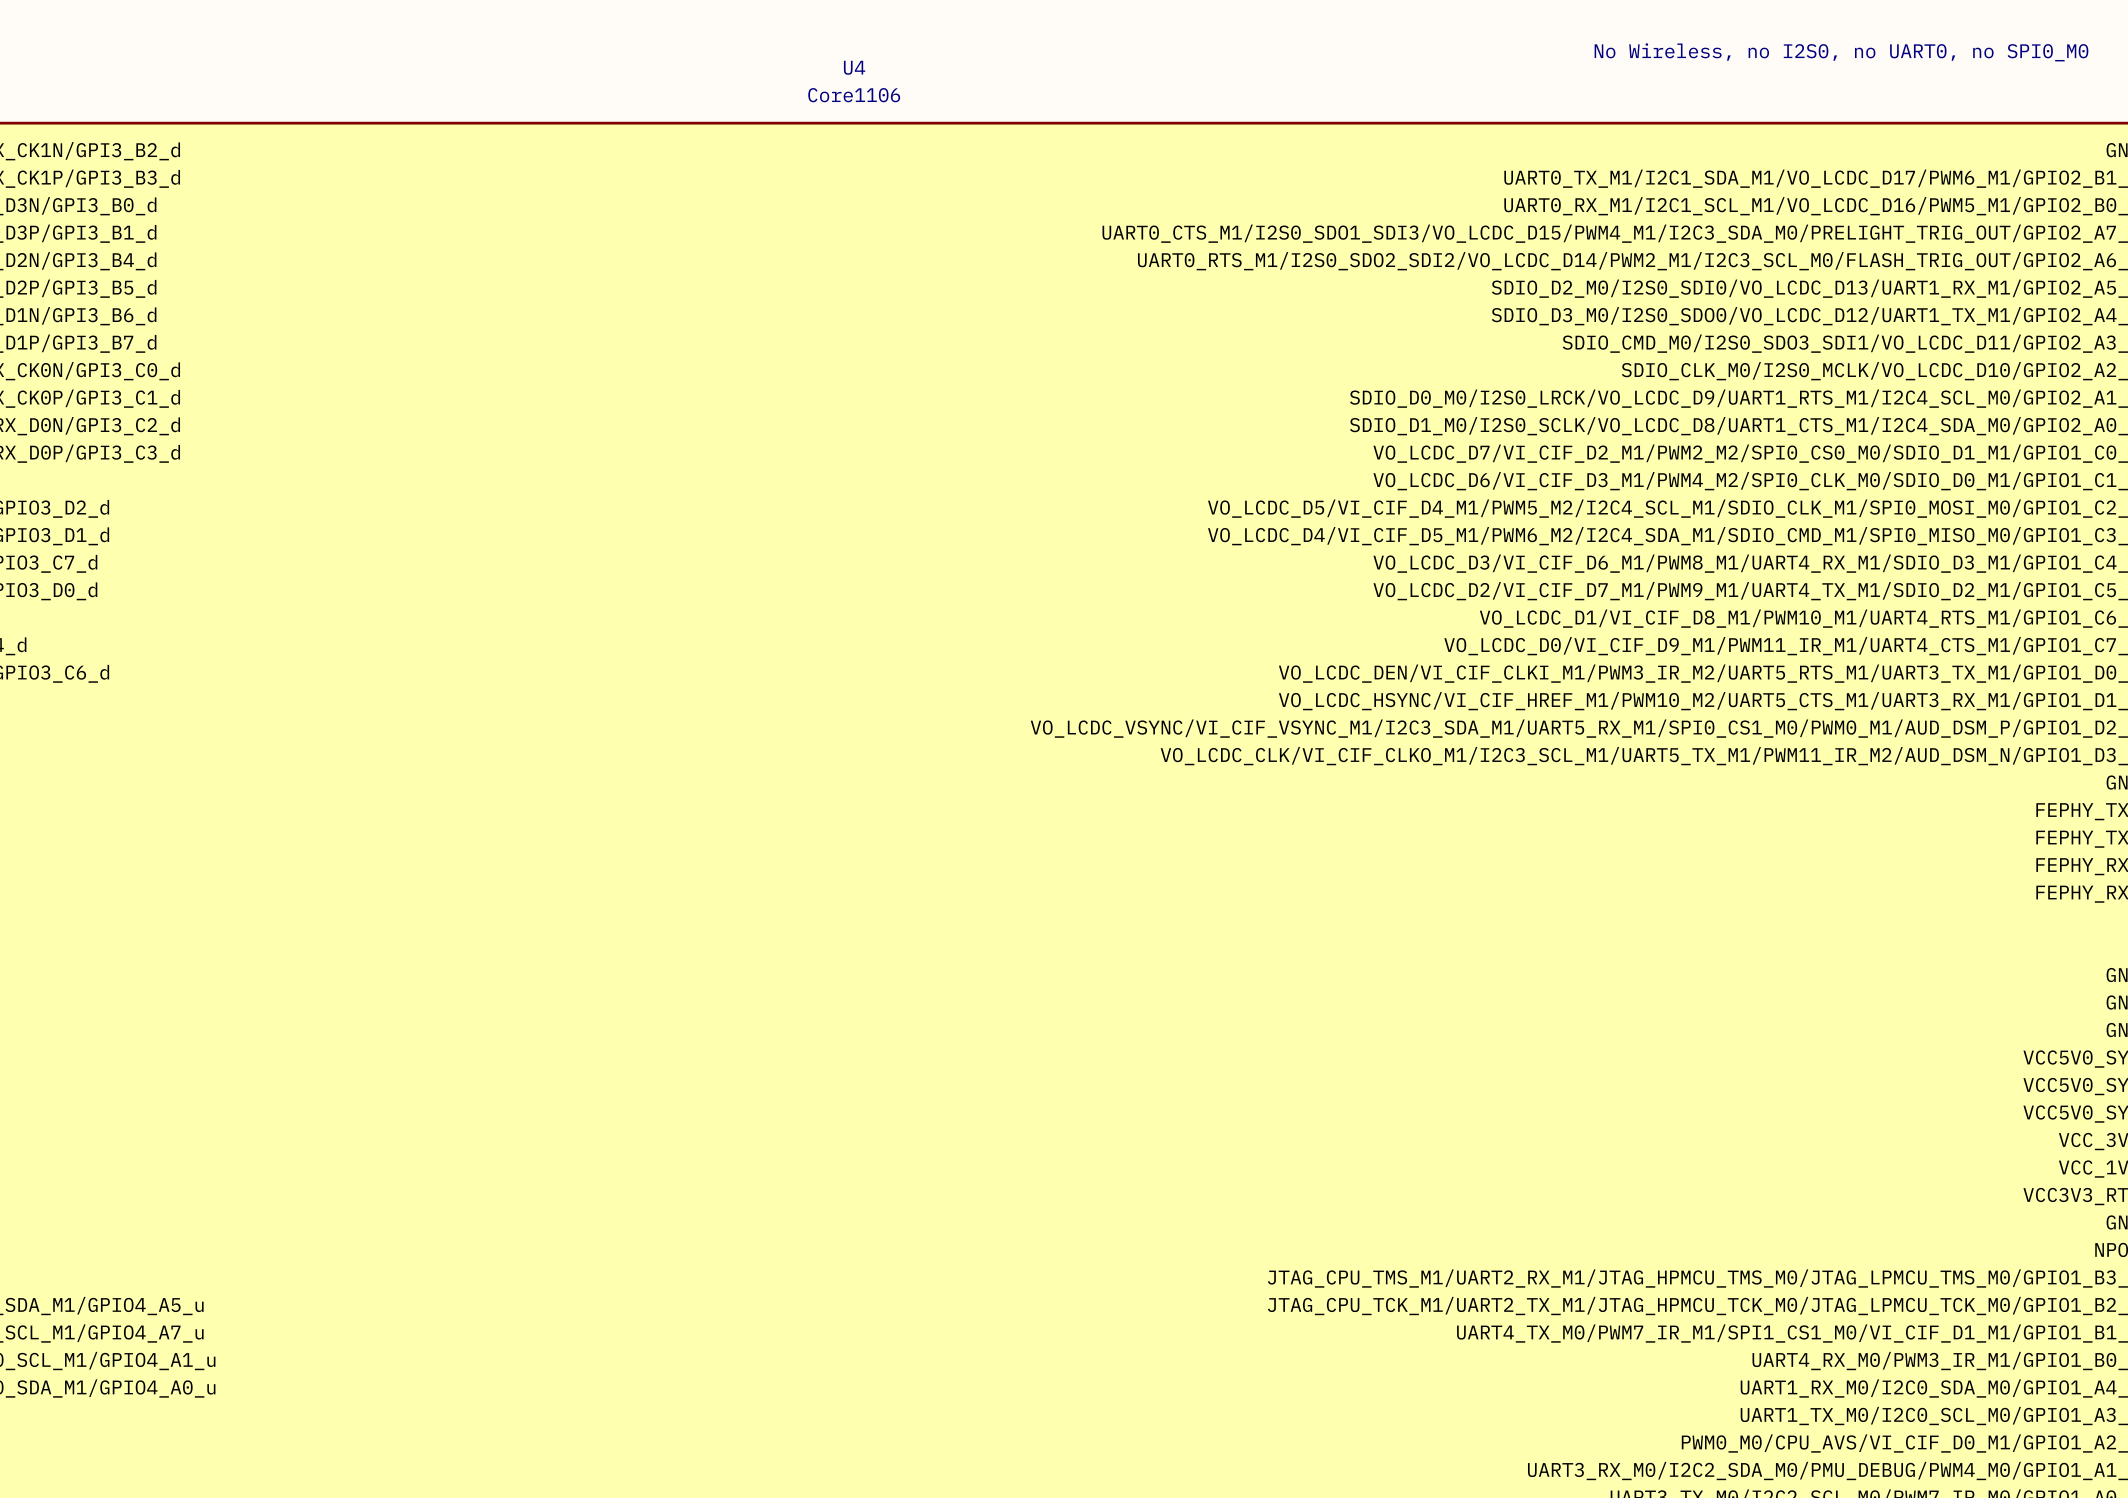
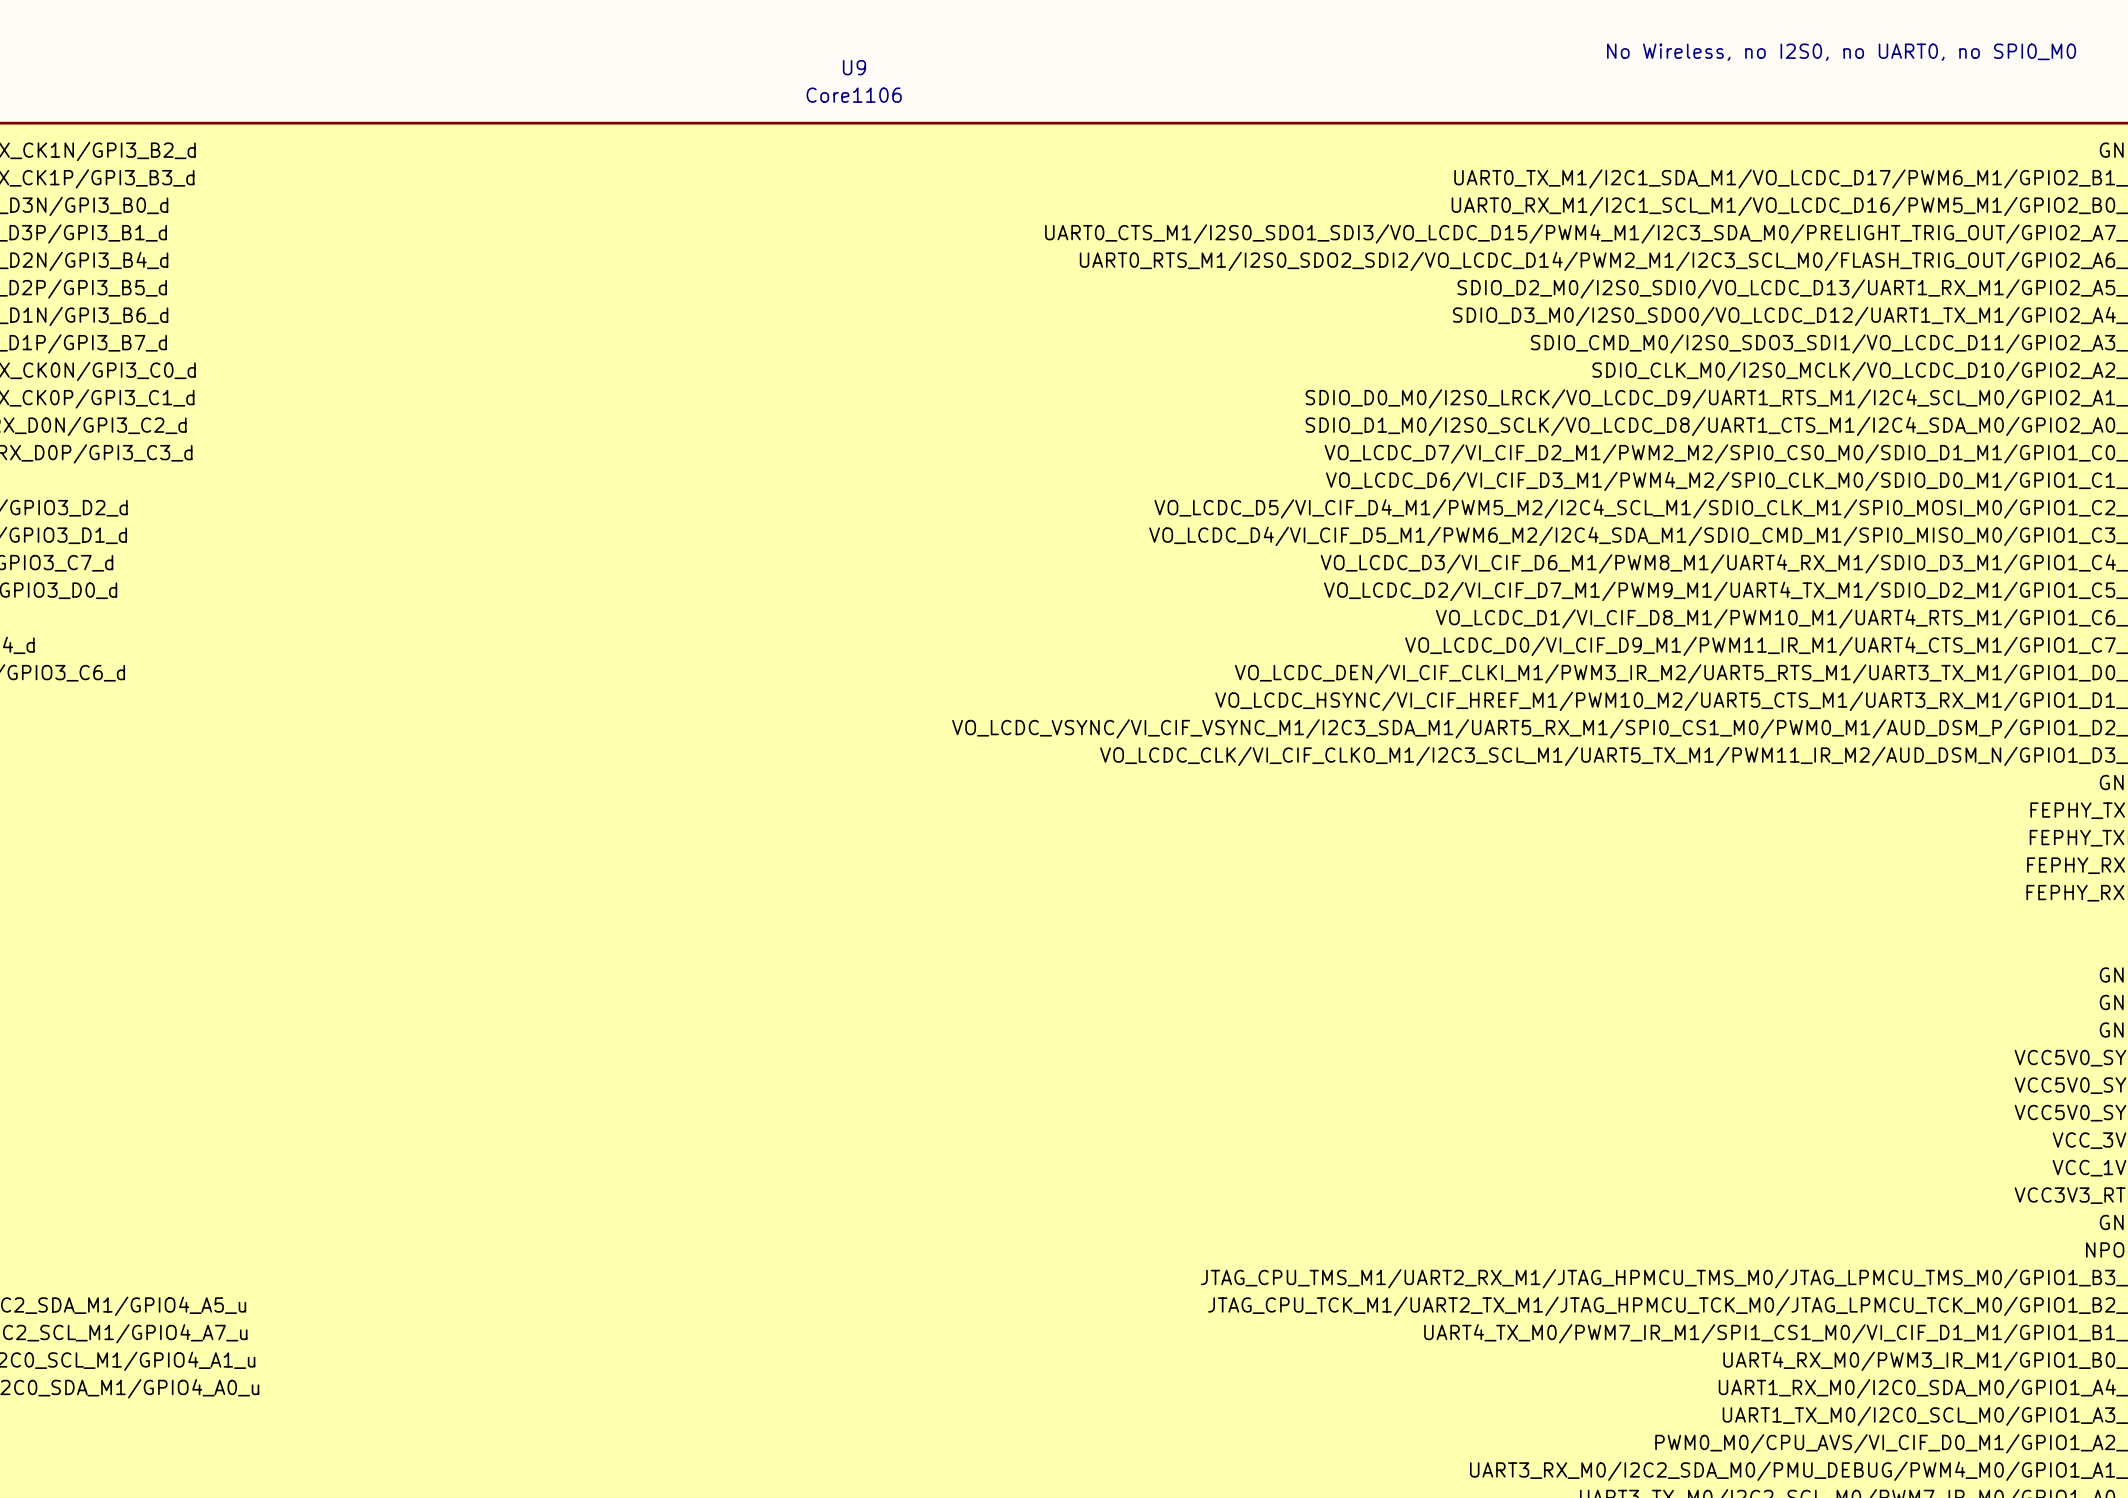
U4 name: U4 (854, 67) -> U9 (854, 67)

